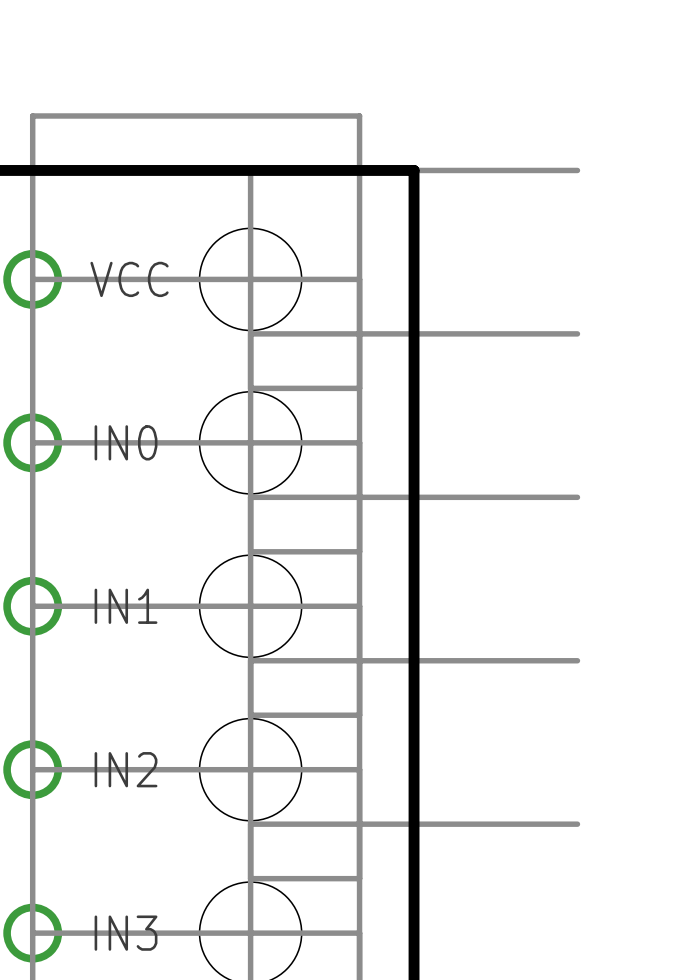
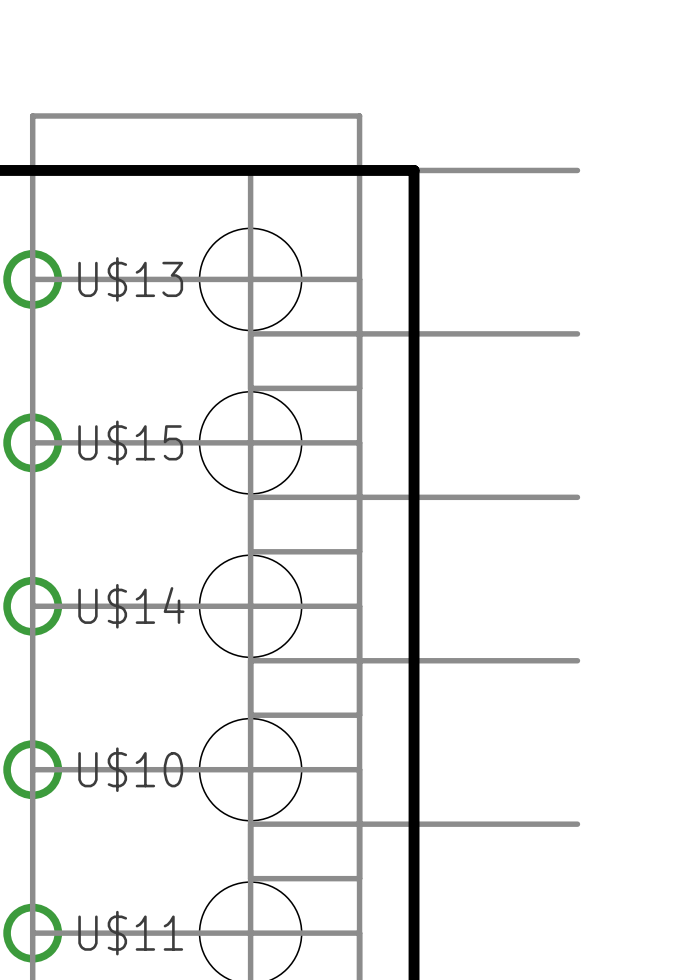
VCC name: VCC (129, 279) -> U$13 (130, 279)
IN0 name: IN0 (126, 442) -> U$15 (130, 442)
IN1 name: IN1 (126, 606) -> U$14 (131, 606)
IN2 name: IN2 (126, 769) -> U$10 (130, 769)
IN3 name: IN3 (126, 933) -> U$11 (130, 933)

